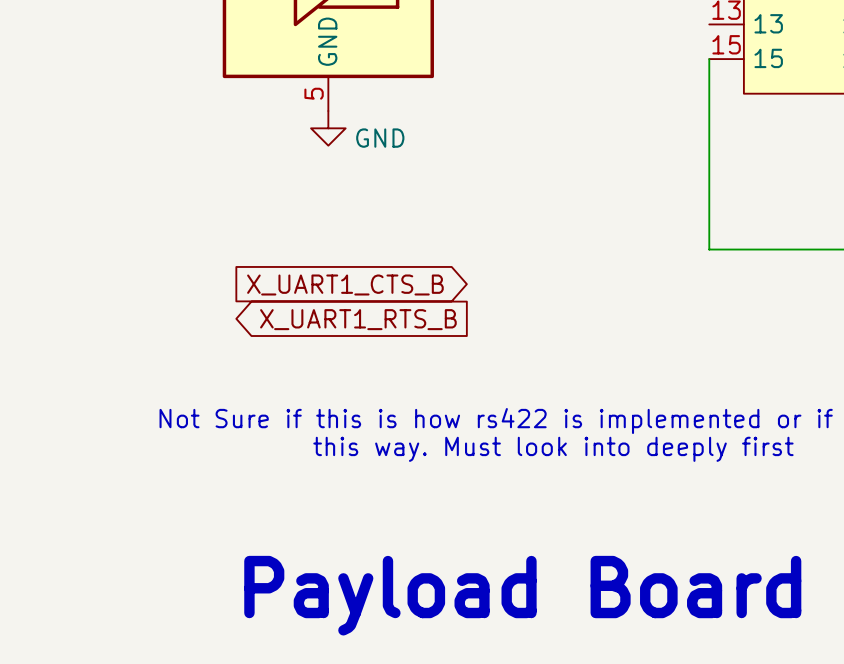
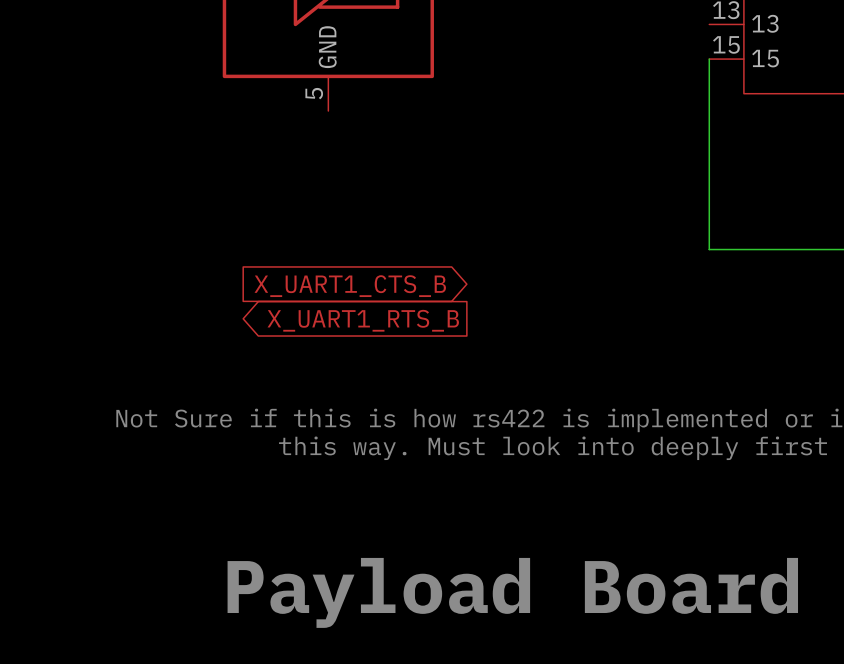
power symbol: GND (328, 128) -> none

